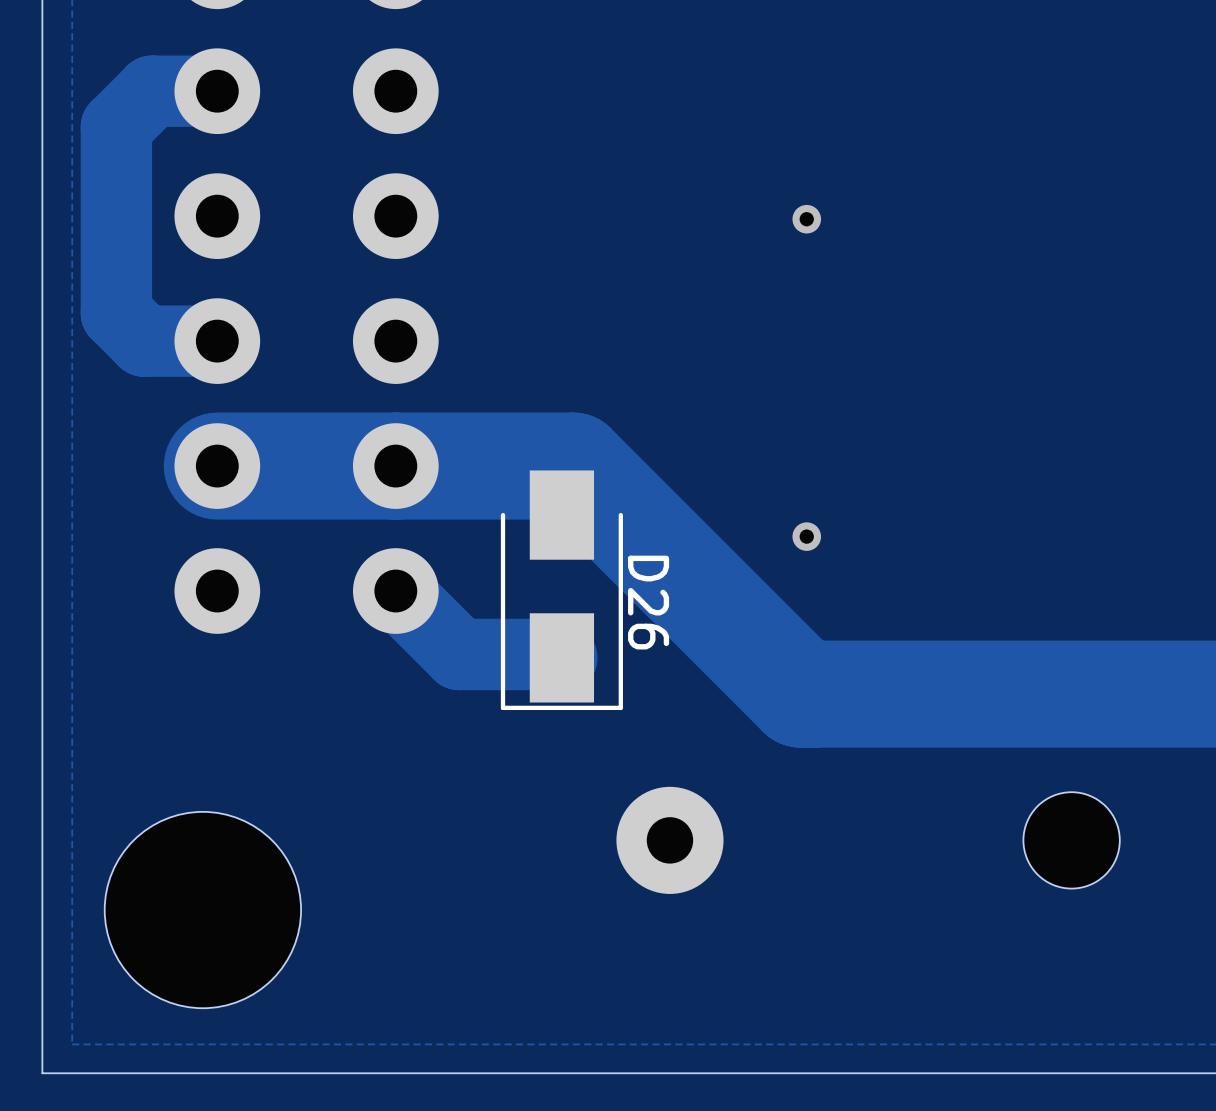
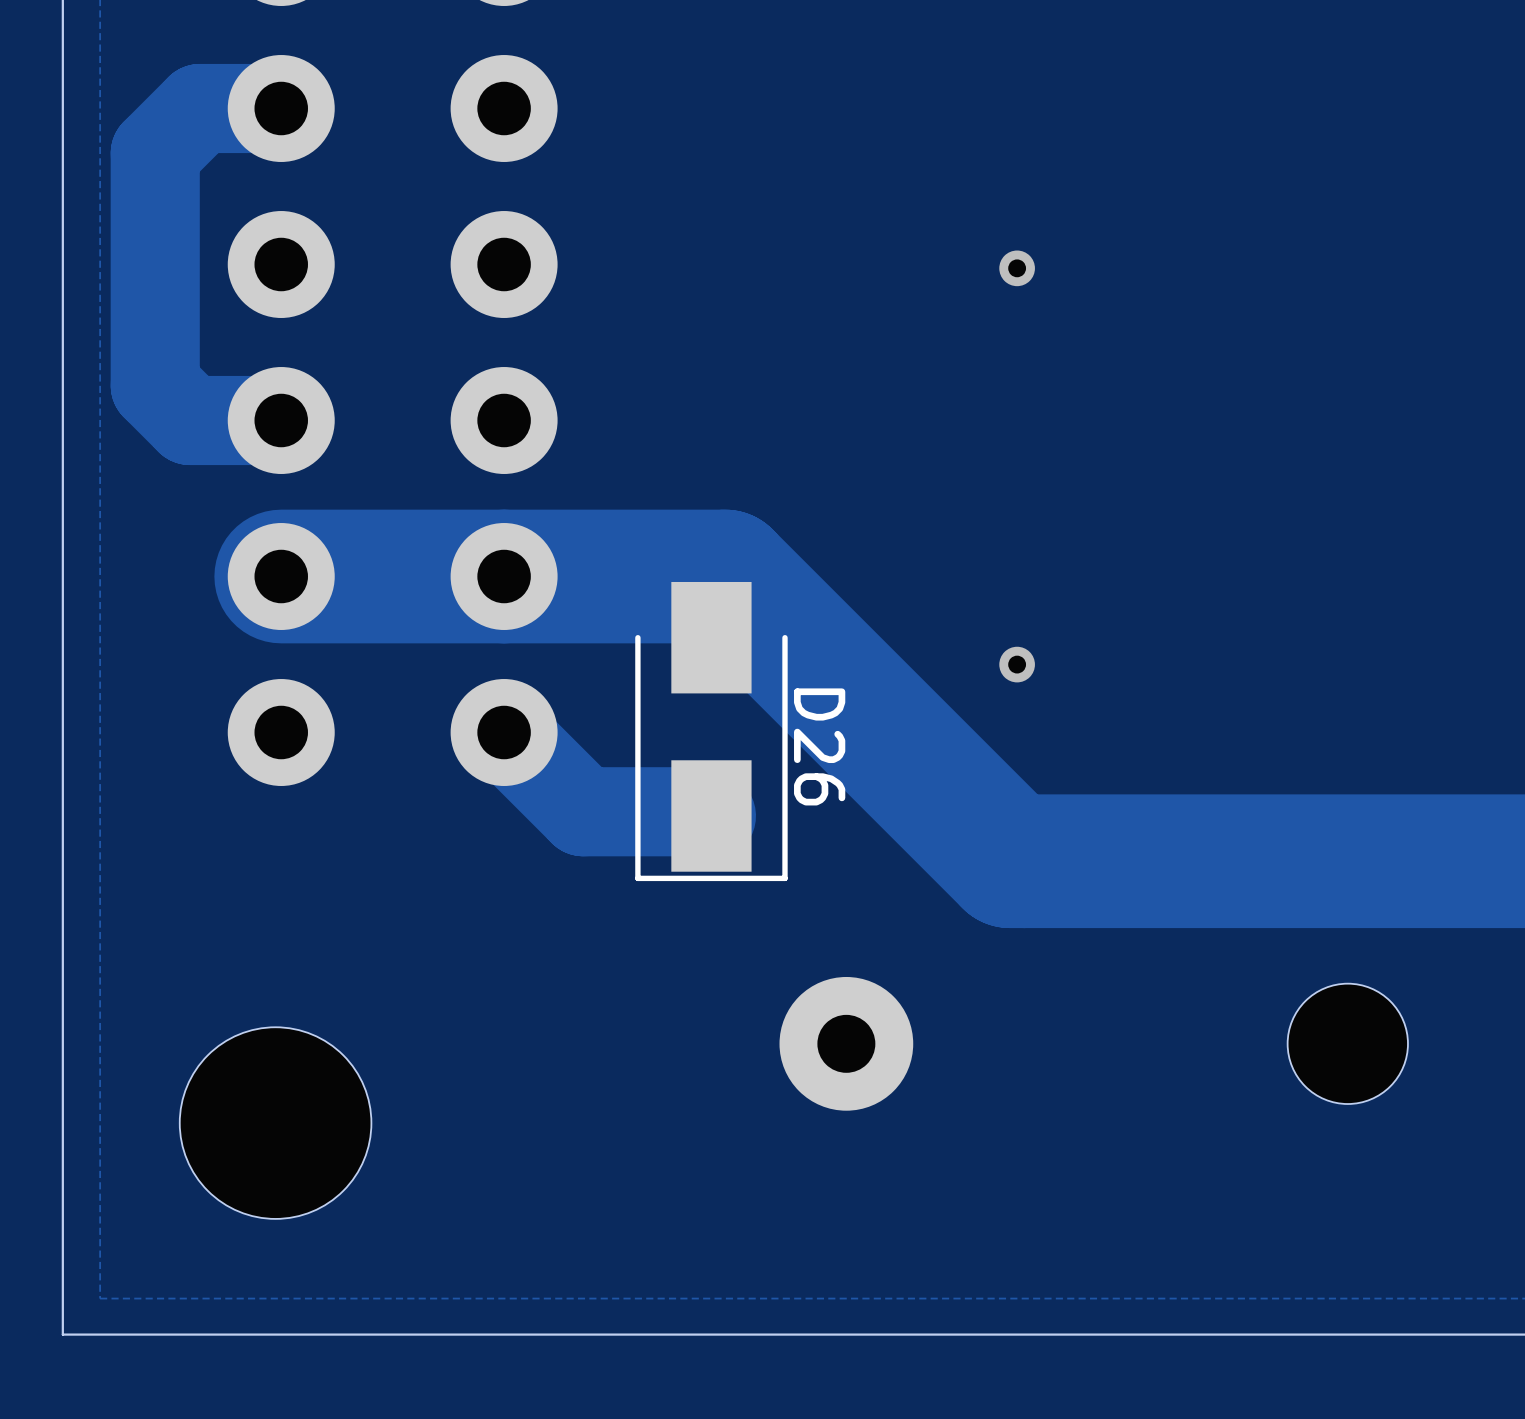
part footprint: [104, 811, 302, 1009] -> [179, 1027, 372, 1219]

